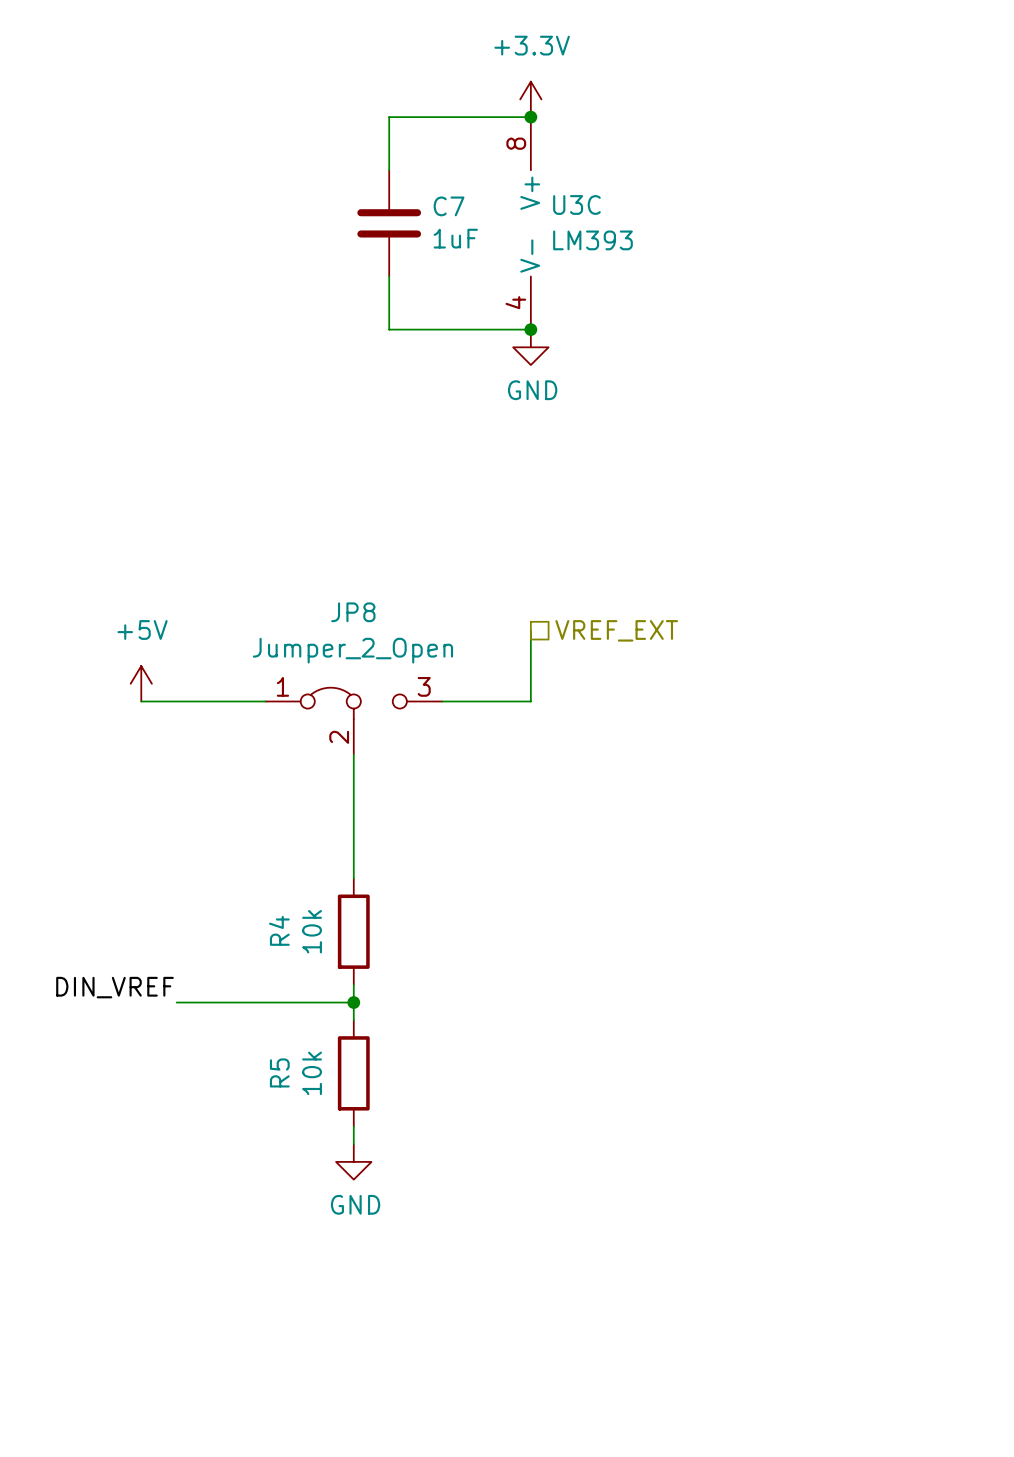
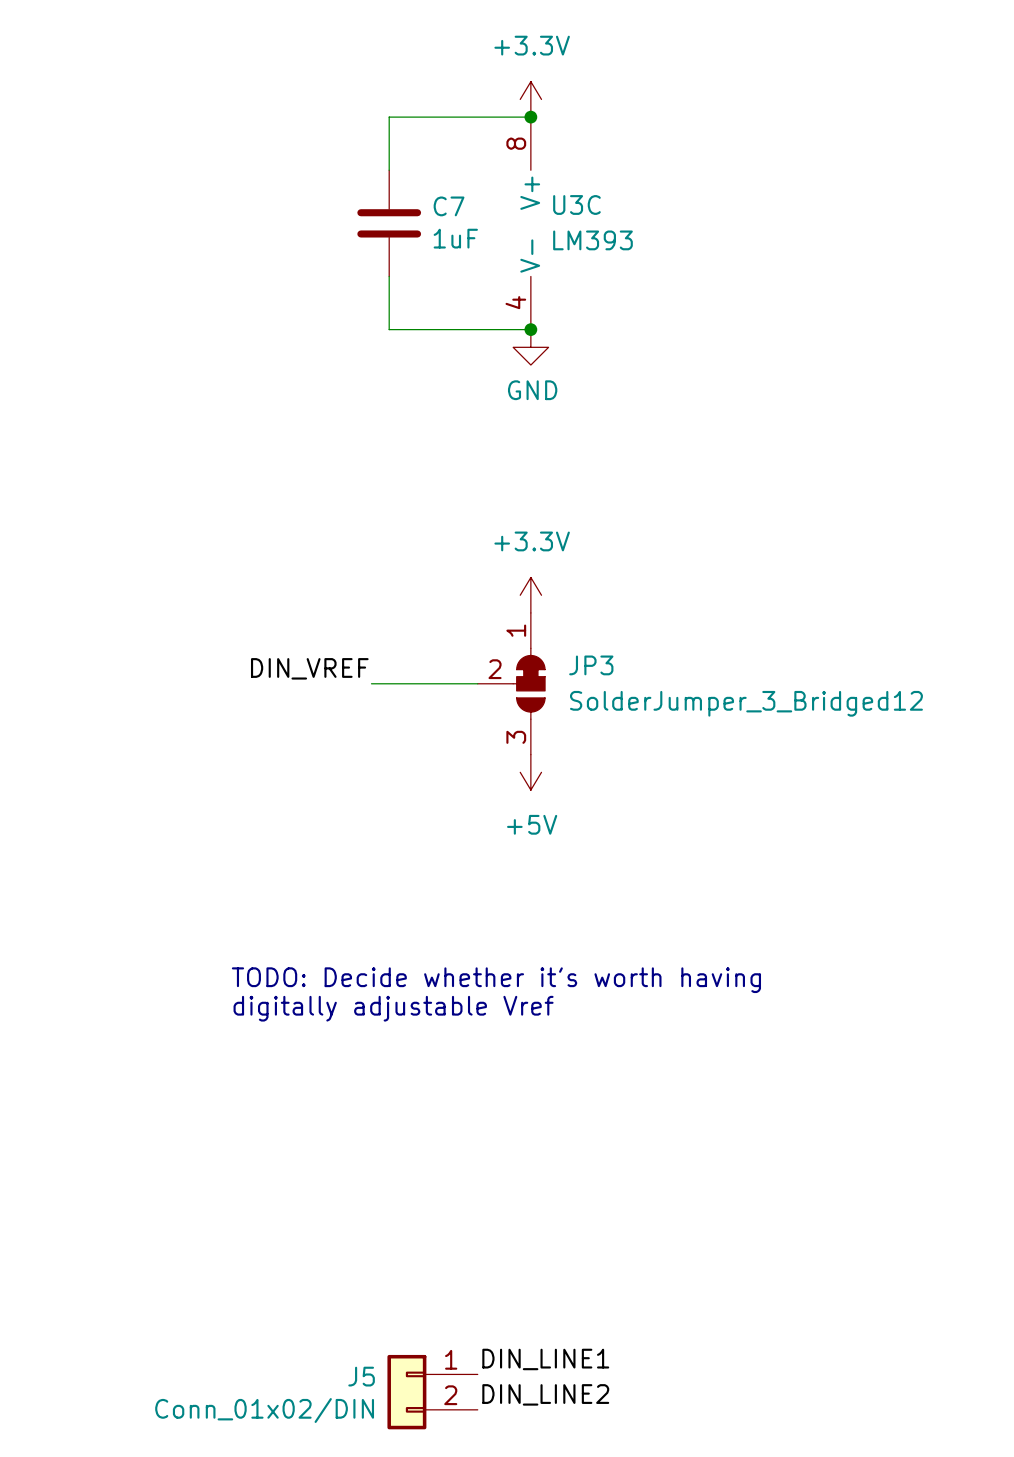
power symbol: none -> +3.3V (530, 595)
wire: (530, 630) (530, 701) (442, 701) -> none
hierarchical label: VREF_EXT (616, 630) -> none
label: none -> DIN_VREF (309, 668)
power symbol: +5V (141, 683) -> none
wire: none -> (371, 683) (477, 683)
JP3: none -> SolderJumper_3_Bridged12 (511, 683)
wire: (141, 701) (265, 701) -> none
JP8: Jumper_2_Open (353, 721) -> none
wire: (353, 754) (353, 878) -> none
power symbol: none -> +5V (530, 772)
R4: 10k (353, 931) -> none
text: none -> TODO: Decide whether it's worth having (496, 980)
wire: (353, 984) (353, 1020) -> none
label: DIN_VREF (115, 987) -> none
wire: (176, 1002) (353, 1002) -> none
junction: (353, 1002) -> none
text: none -> digitally adjustable Vref (393, 1008)
R5: 10k (353, 1073) -> none
wire: (353, 1126) (353, 1144) -> none
power symbol: GND (353, 1161) -> none
label: none -> DIN_LINE1 (545, 1359)
J5: none -> Conn_01x02/DIN (432, 1392)
label: none -> DIN_LINE2 (545, 1394)

